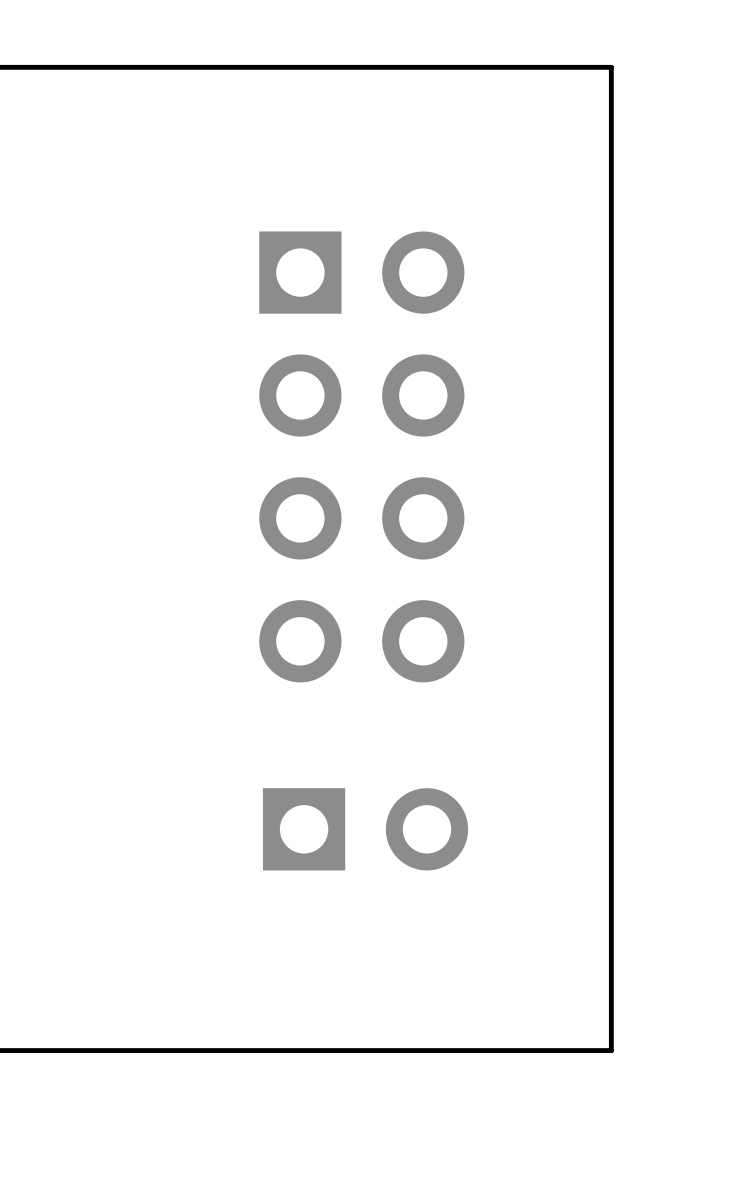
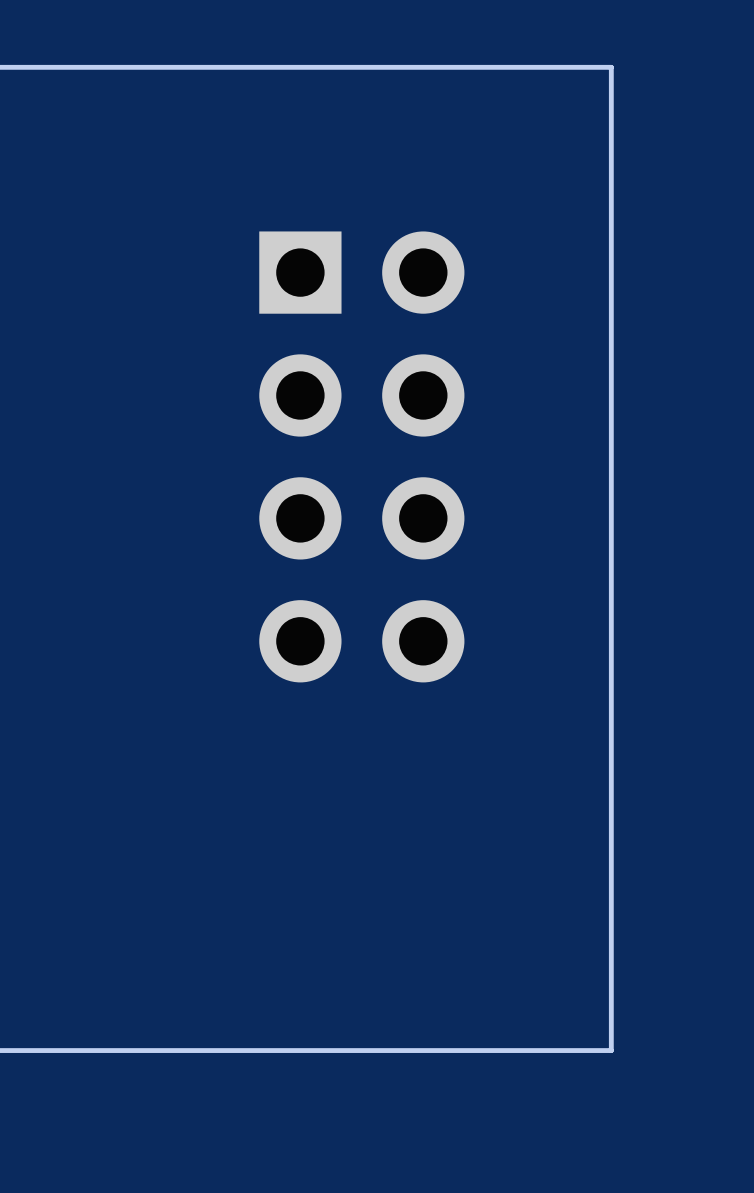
part: (365, 829) -> none

